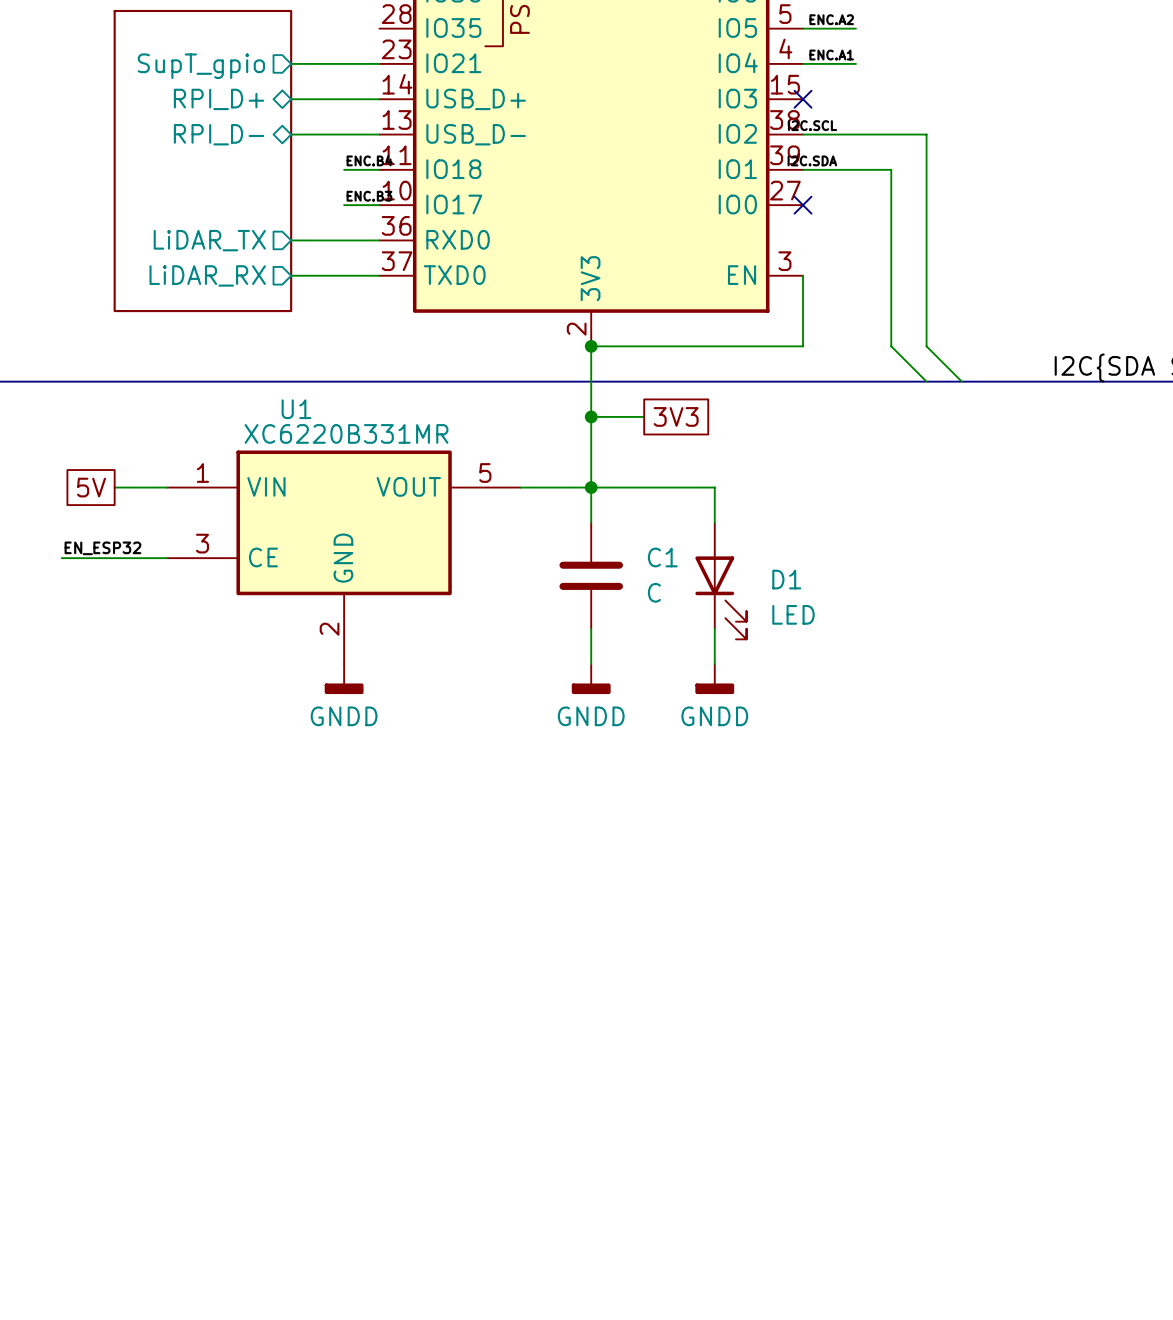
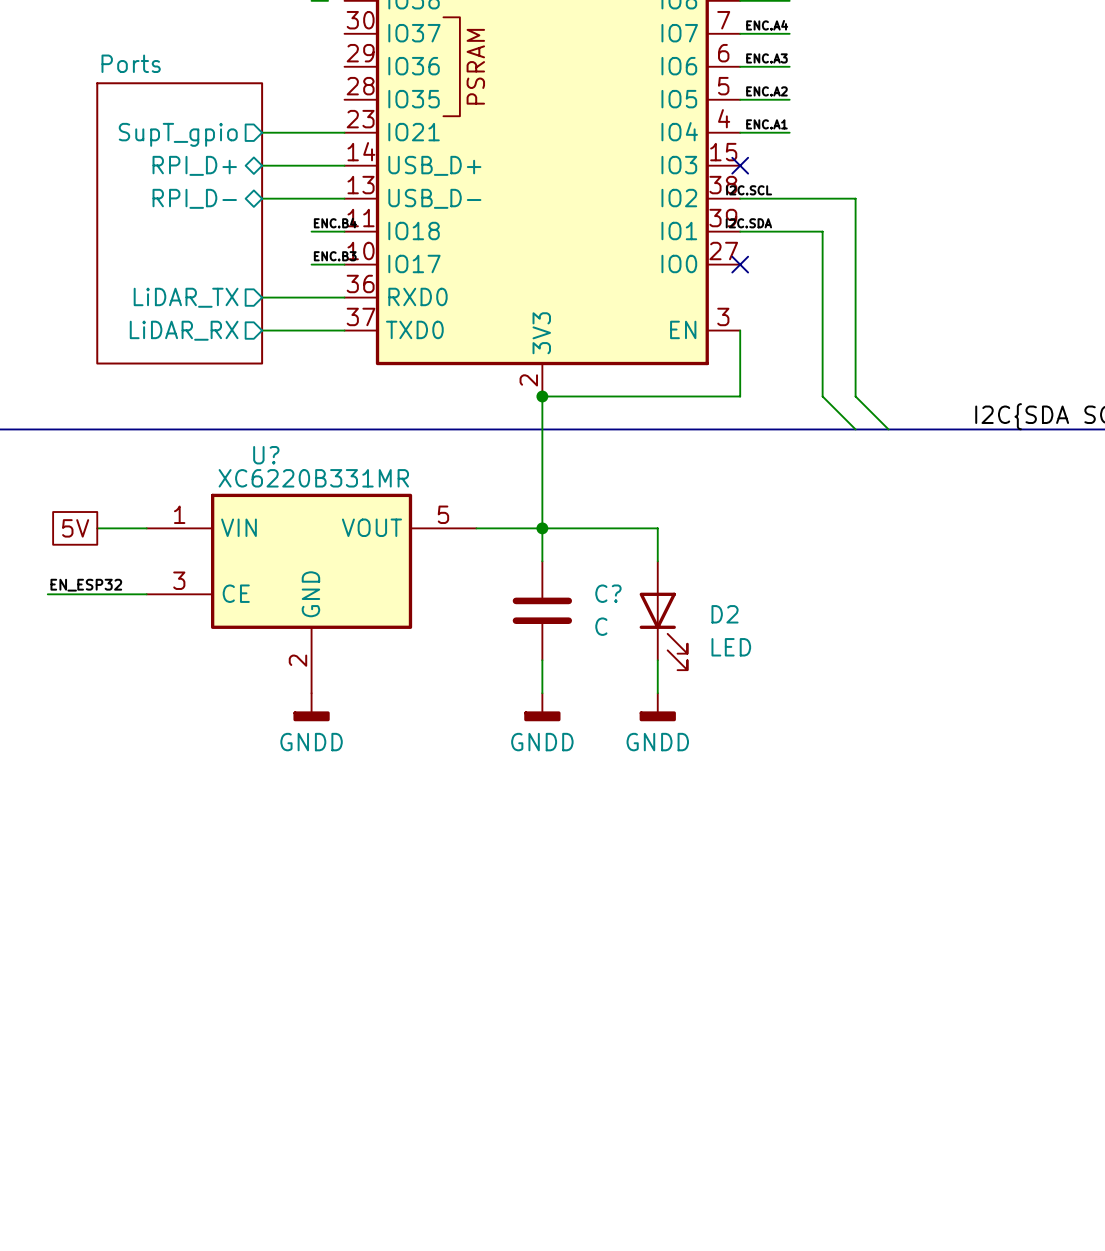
U1 name: U1 (296, 409) -> U? (266, 455)
wire: (591, 416) (644, 416) -> none
junction: (591, 416) -> none
global label: 3V3 (676, 416) -> none
C1 name: C1 (662, 557) -> C? (608, 593)
D1 name: D1 (786, 579) -> D2 (725, 614)

